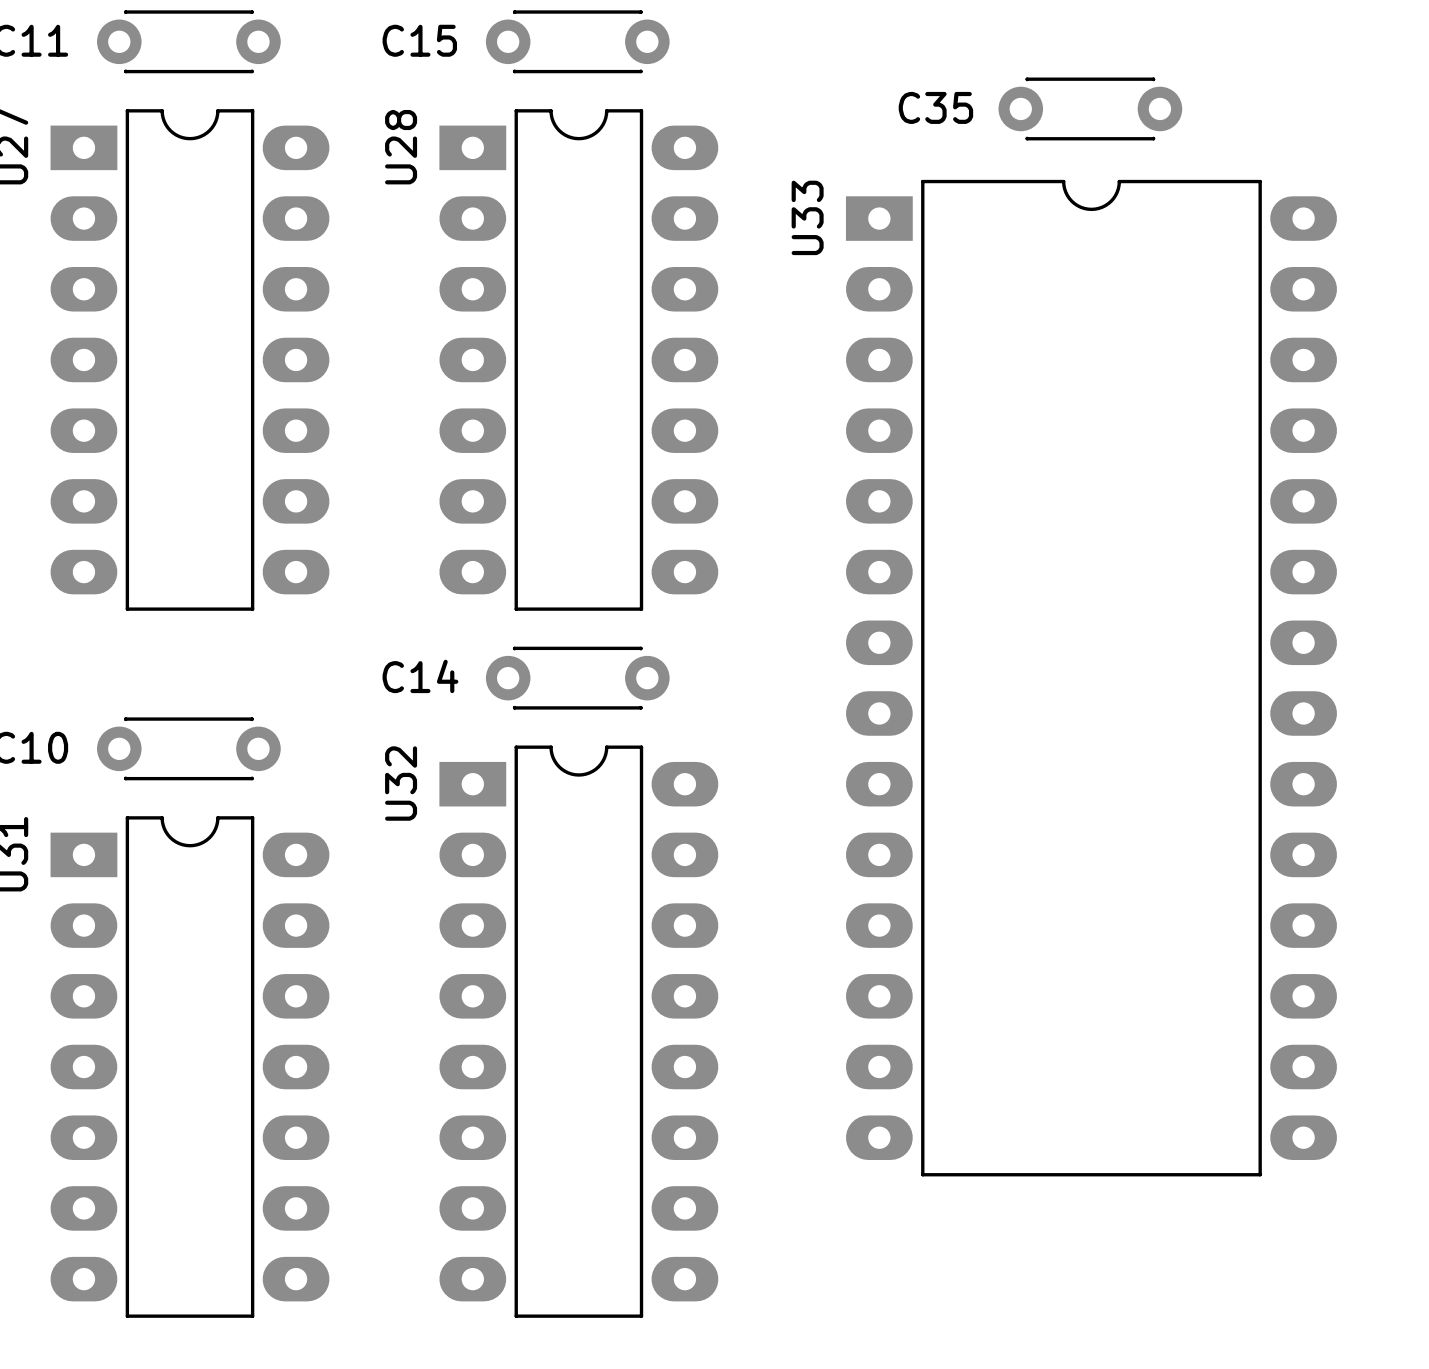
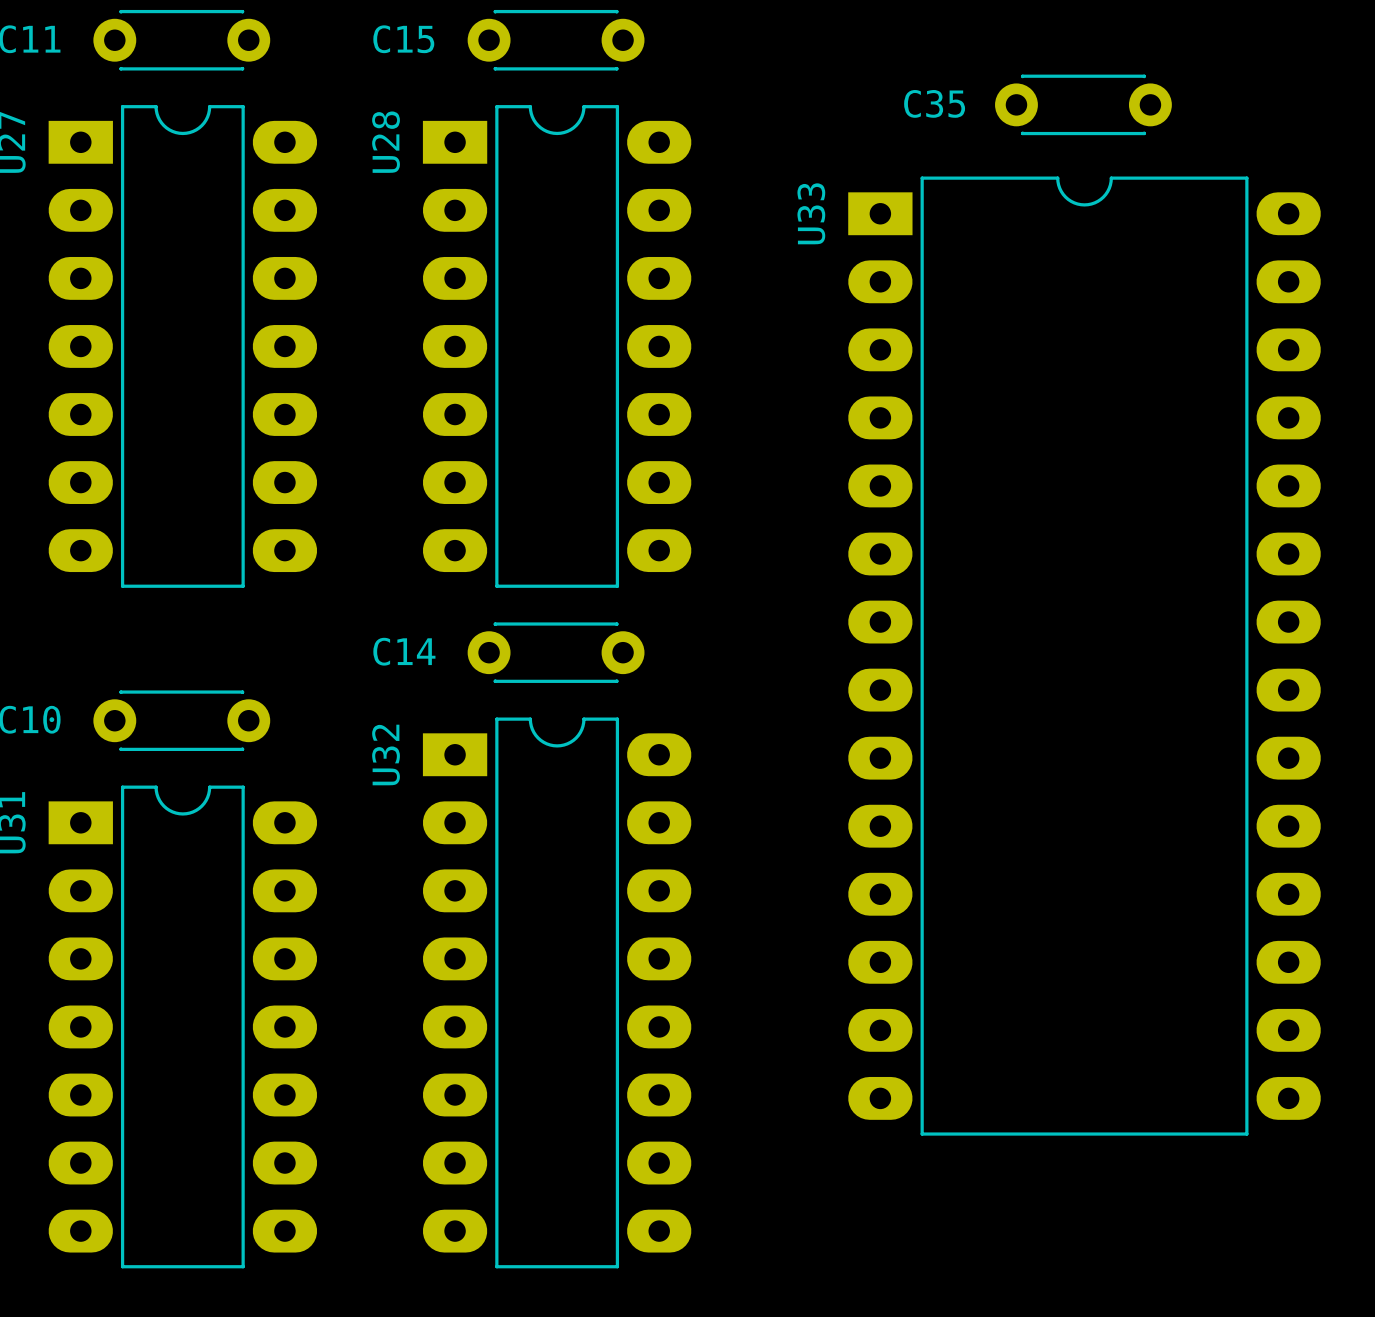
C35 position: (1090, 108) -> (1083, 104)
U33 position: (1091, 678) -> (1084, 656)

